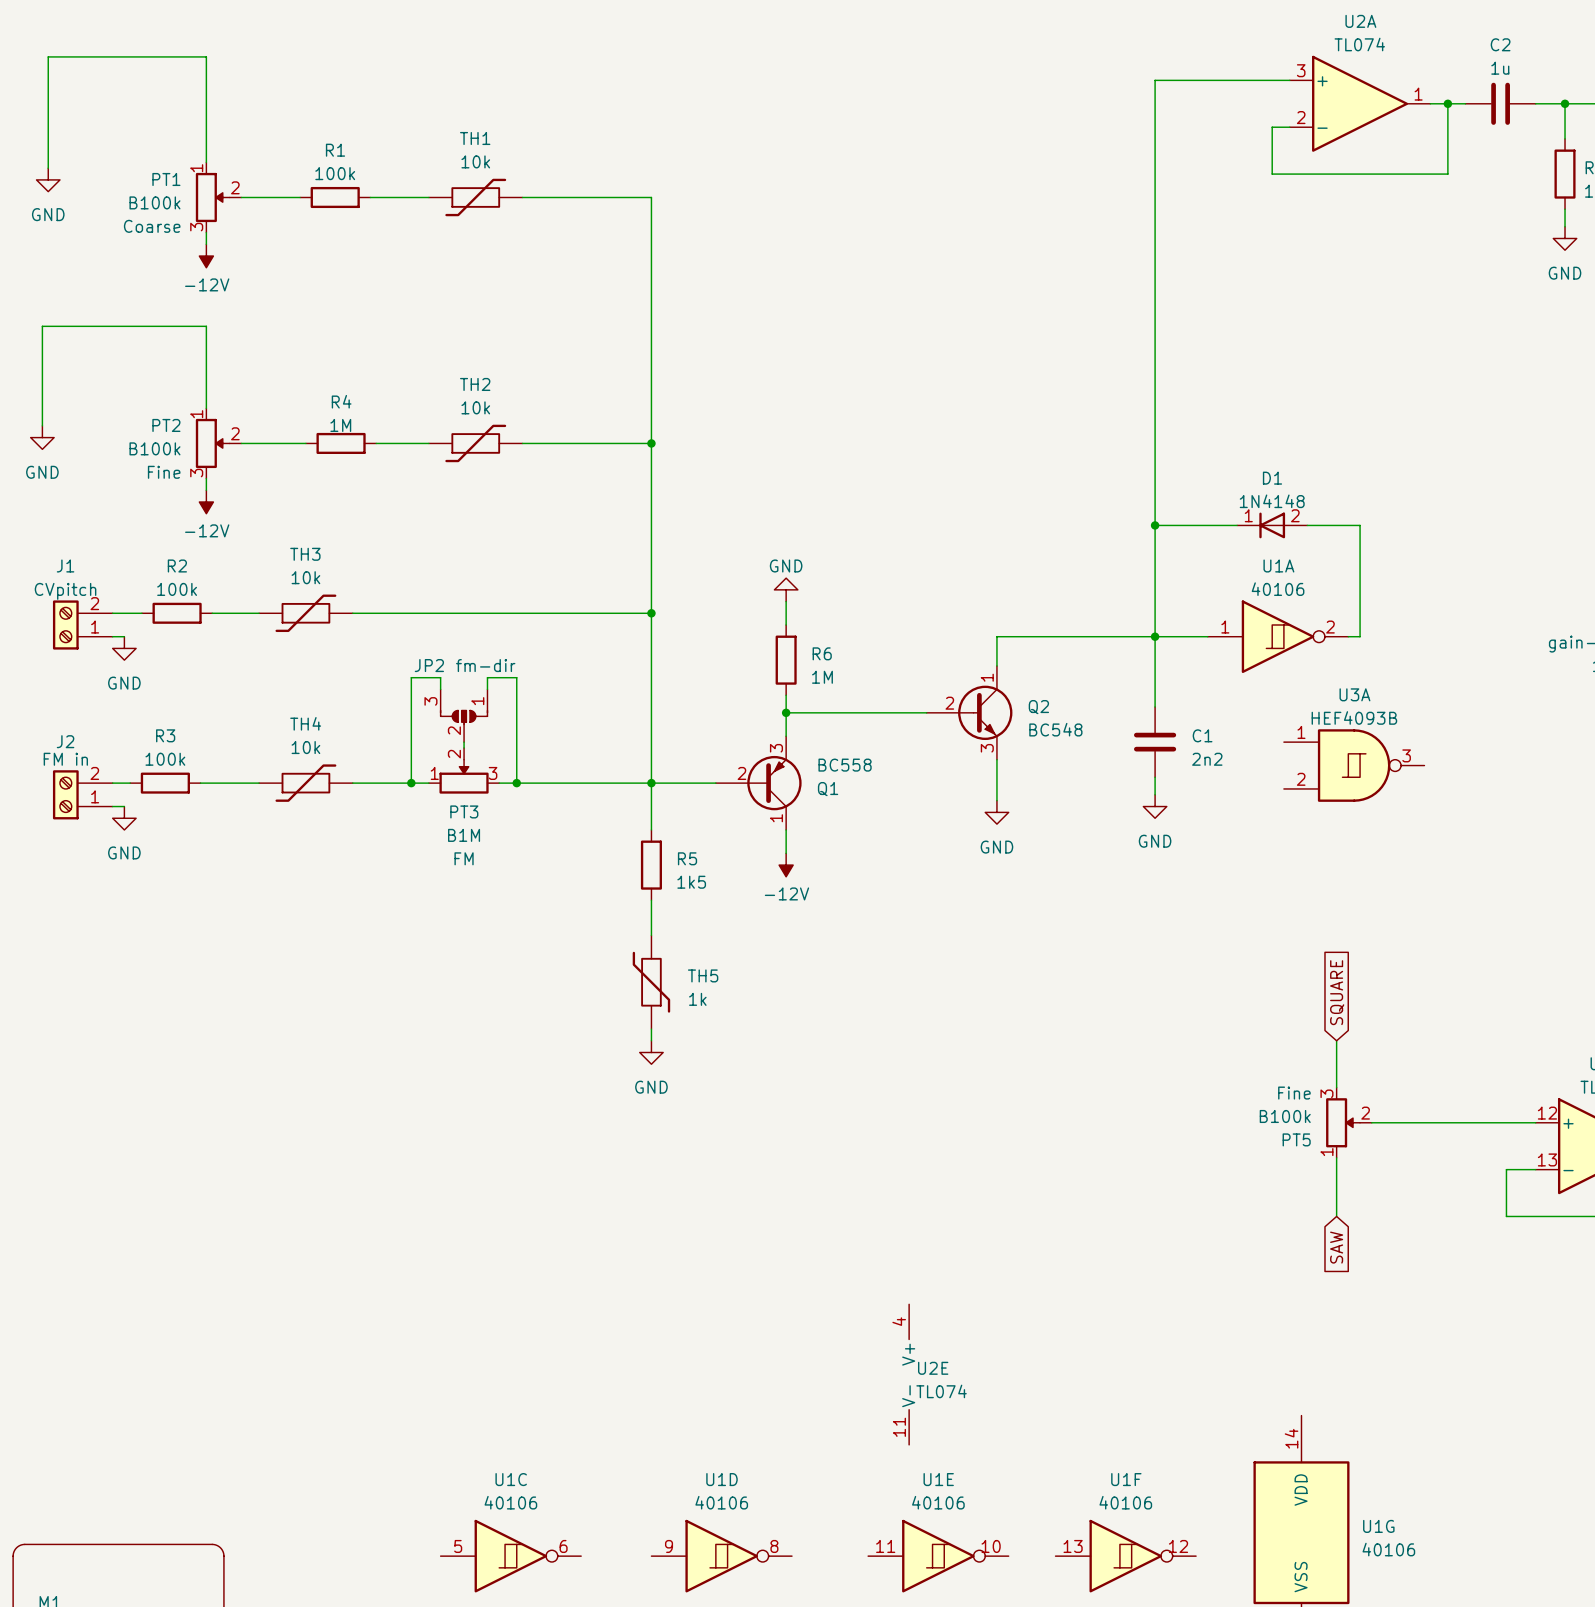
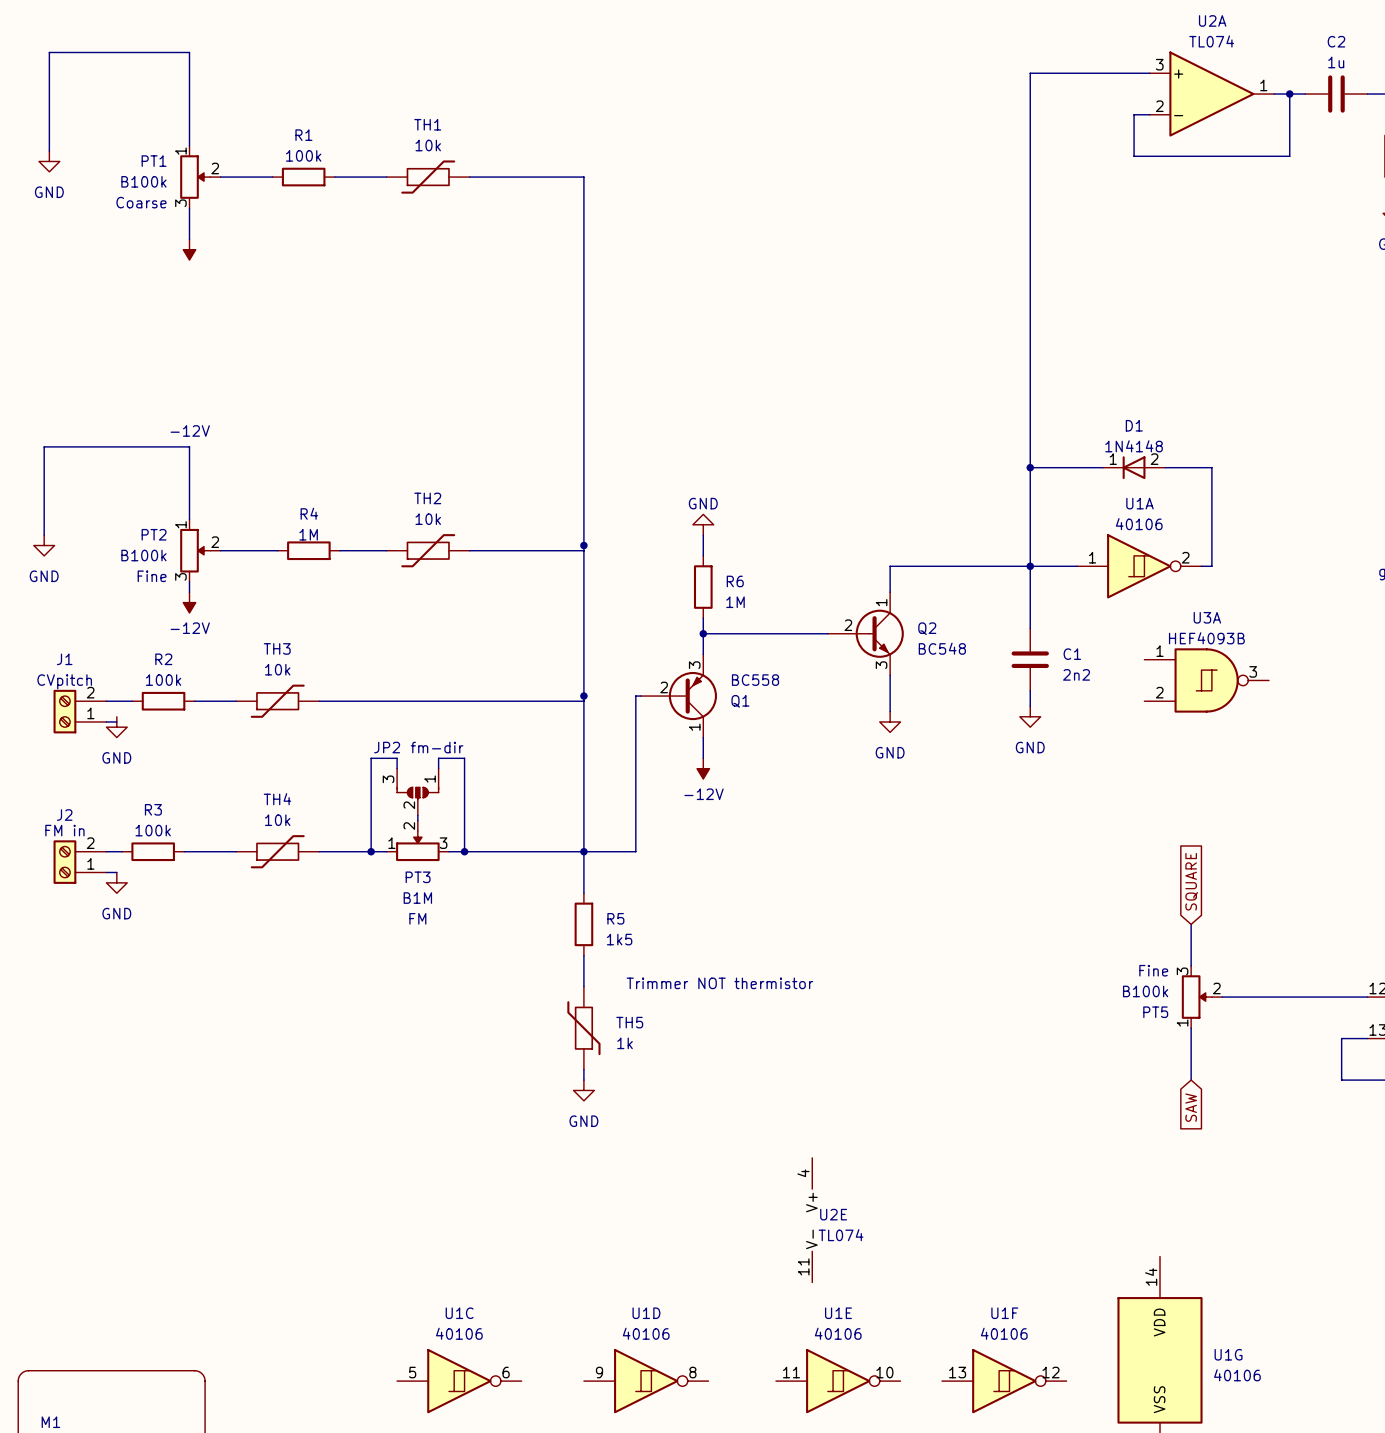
power symbol position: -12V (206, 256) -> -12V (189, 249)
power symbol text position: -12V (207, 284) -> -12V (190, 430)
wire: (206, 408) (206, 326) (42, 326) (42, 425) -> (189, 519) (189, 446) (44, 446) (44, 535)
power symbol: GND (42, 437) -> none
PT2 position: (218, 443) -> (200, 550)
wire: (241, 443) (305, 443) -> (220, 550) (277, 550)
R4 position: (341, 443) -> (308, 550)
wire: (376, 443) (428, 443) -> (340, 550) (386, 550)
TH2 position: (475, 443) -> (428, 550)
wire: (522, 443) (651, 443) -> (469, 550) (583, 550)
junction: (651, 443) -> none
wire: (206, 478) (206, 490) -> (189, 581) (189, 592)
power symbol: -12V (206, 502) -> none
power symbol: none -> GND (44, 545)
wire: (112, 613) (141, 613) -> (106, 701) (132, 701)
R2 position: (177, 613) -> (163, 701)
wire: (212, 613) (259, 613) -> (194, 701) (236, 701)
TH3 position: (305, 613) -> (277, 701)
wire: (352, 613) (651, 613) -> (319, 701) (583, 701)
J1 position: (82, 625) -> (79, 711)
wire: (112, 636) (124, 636) -> (106, 721) (116, 721)
power symbol: GND (124, 648) -> none
power symbol: none -> -12V (189, 602)
wire: (440, 689) (440, 677) (411, 677) (411, 783) -> (397, 768) (397, 758) (371, 758) (371, 851)
wire: (487, 689) (487, 677) (516, 677) (516, 783) -> (438, 768) (438, 758) (464, 758) (464, 851)
JP2 position: (464, 715) -> (417, 792)
wire: (464, 742) (464, 747) -> (417, 815) (417, 820)
PT3 position: (464, 770) -> (417, 840)
wire: (112, 783) (130, 783) -> (106, 851) (122, 851)
R3 position: (165, 783) -> (153, 851)
wire: (200, 783) (259, 783) -> (184, 851) (236, 851)
TH4 position: (305, 783) -> (277, 851)
wire: (352, 783) (428, 783) -> (319, 851) (386, 851)
junction: (411, 783) -> none
wire: (499, 783) (710, 783) -> (448, 851) (635, 851) (635, 696)
junction: (516, 783) -> none
J2 position: (82, 794) -> (79, 862)
wire: (112, 806) (124, 806) -> (106, 872) (116, 872)
wire: none -> (583, 737) (583, 799)
R5 position: (651, 865) -> (583, 924)
wire: none -> (583, 830) (583, 893)
junction: none -> (371, 851)
junction: none -> (464, 851)
junction: none -> (583, 851)
TH5 position: (651, 982) -> (583, 1028)
power symbol: none -> GND (116, 882)
wire: (651, 1029) (651, 1040) -> (583, 1069) (583, 1080)
power symbol position: GND (651, 1052) -> GND (583, 1090)
wire: none -> (583, 955) (583, 986)
text: none -> Trimmer NOT thermistor (719, 983)

